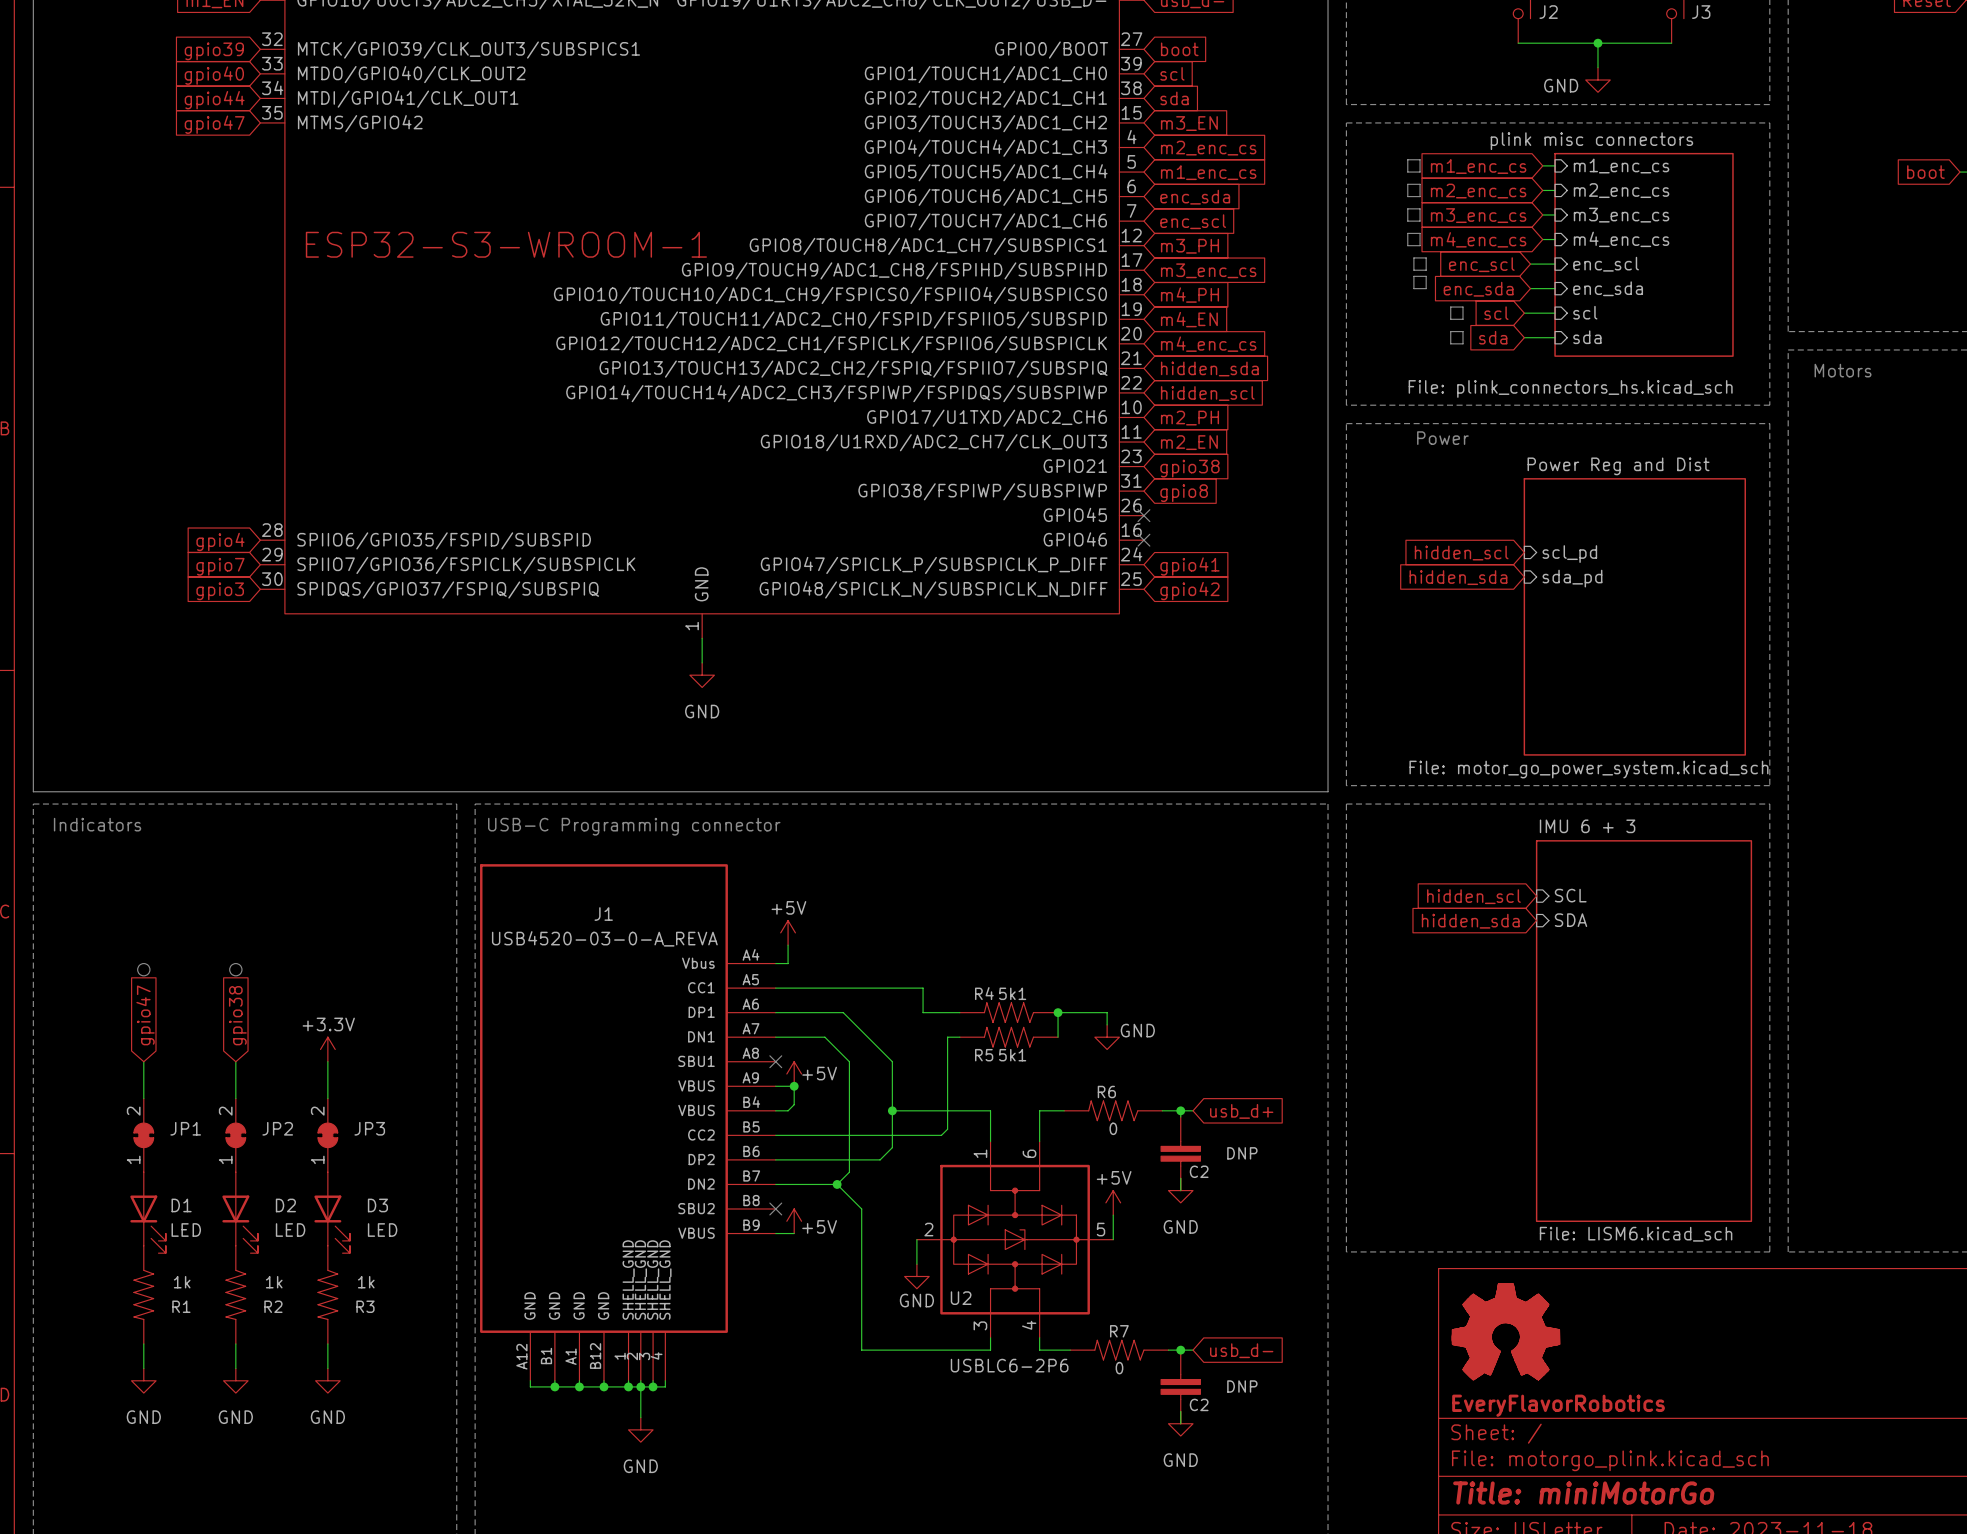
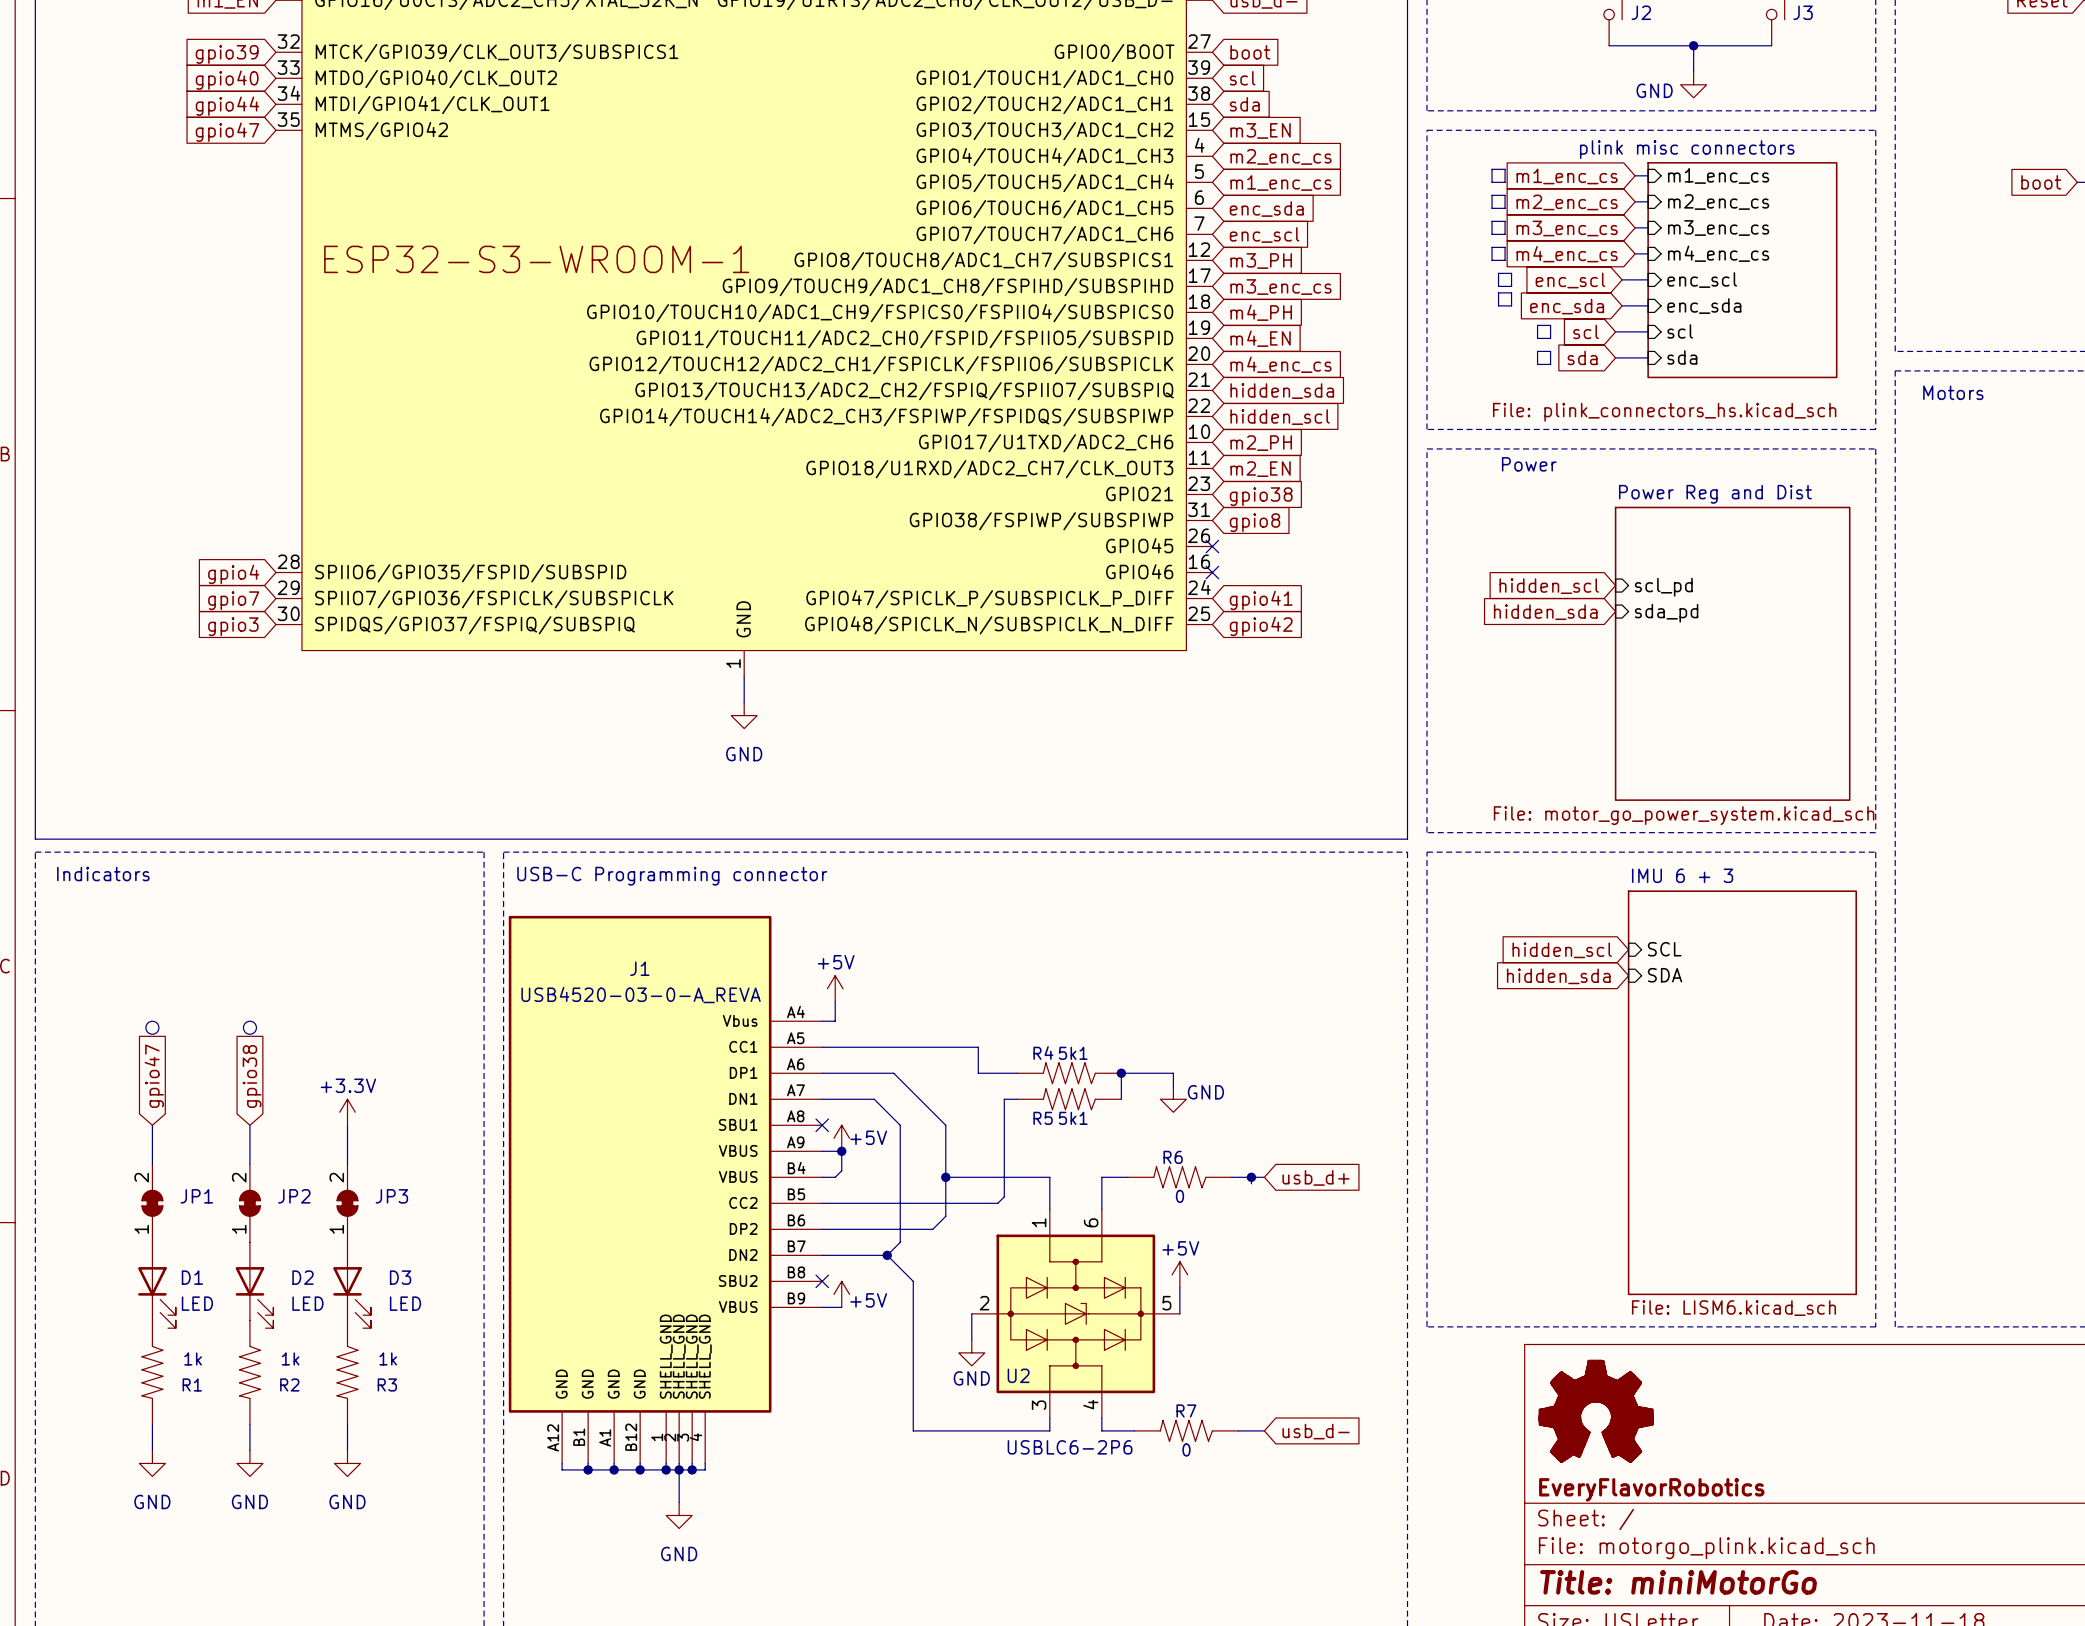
C2: DNP (1180, 1153) -> none
wire: (1180, 1178) (1180, 1190) -> none
power symbol: GND (1180, 1190) -> none
junction: (1180, 1350) -> none
C2: DNP (1180, 1386) -> none
wire: (1180, 1411) (1180, 1423) -> none
power symbol: GND (1180, 1423) -> none

